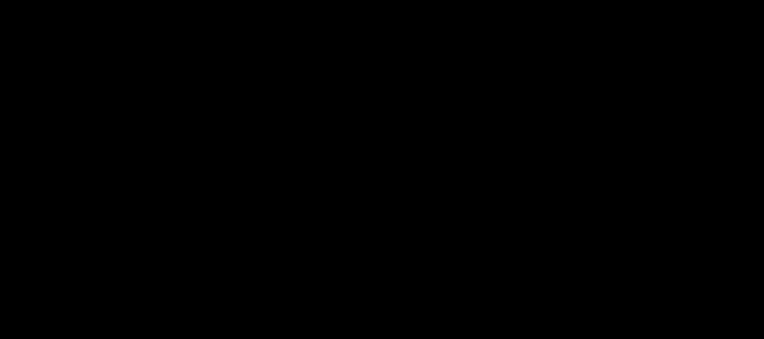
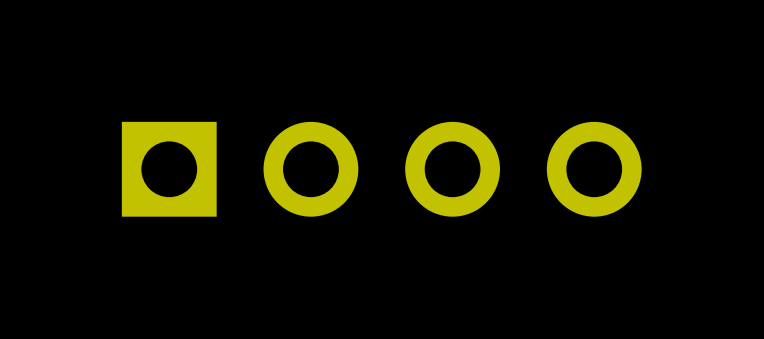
part: none -> (381, 169)

